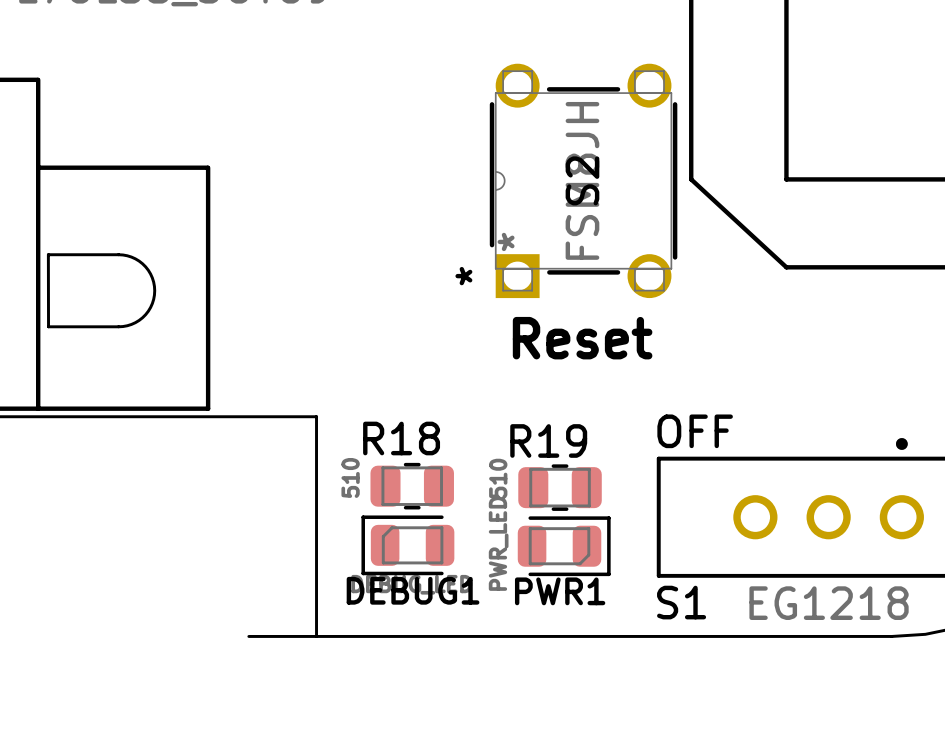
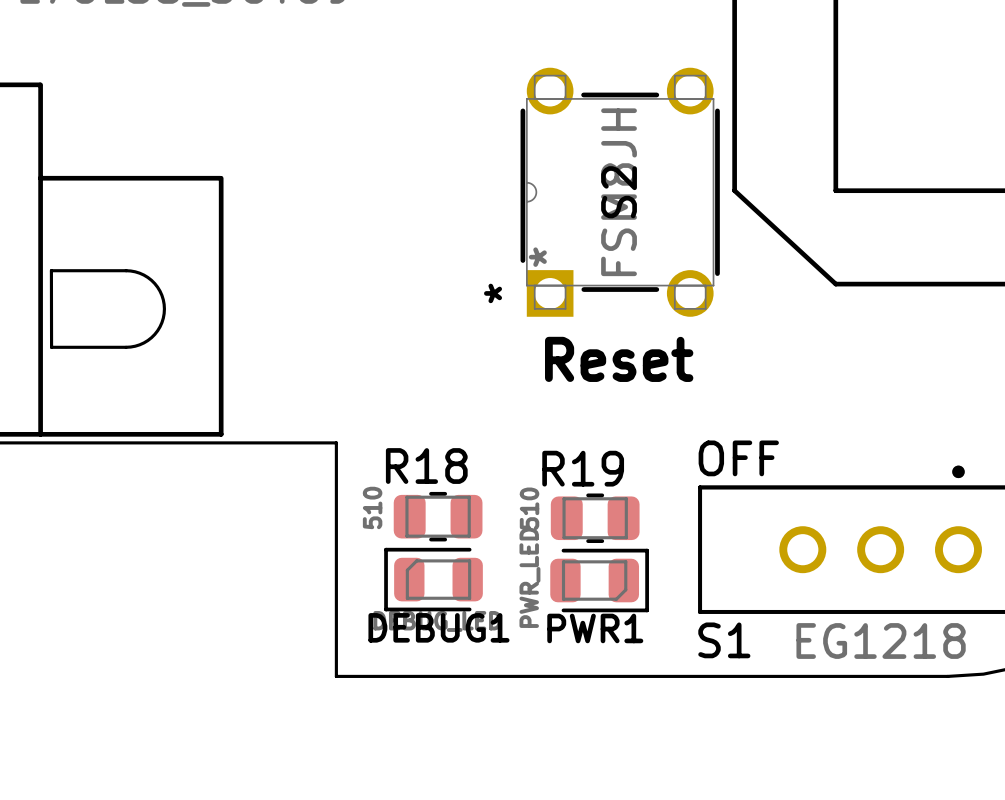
board edge: (248, 636) (316, 636) -> none

